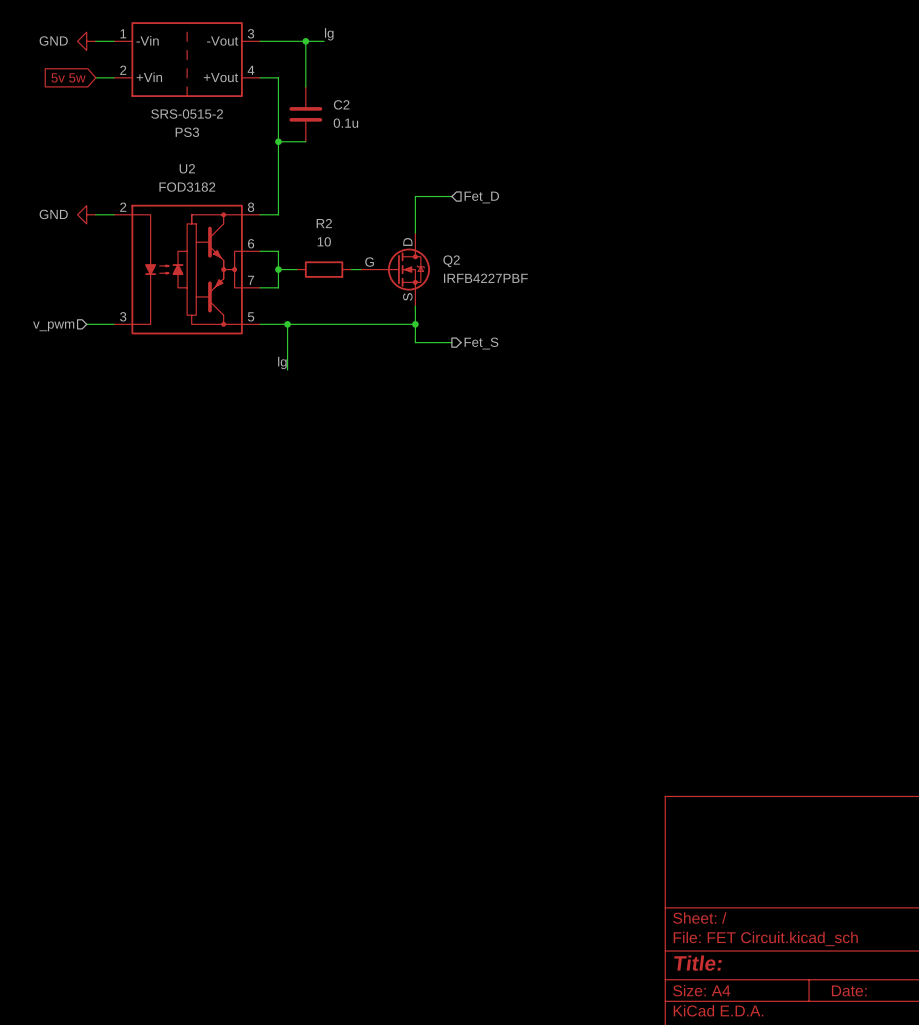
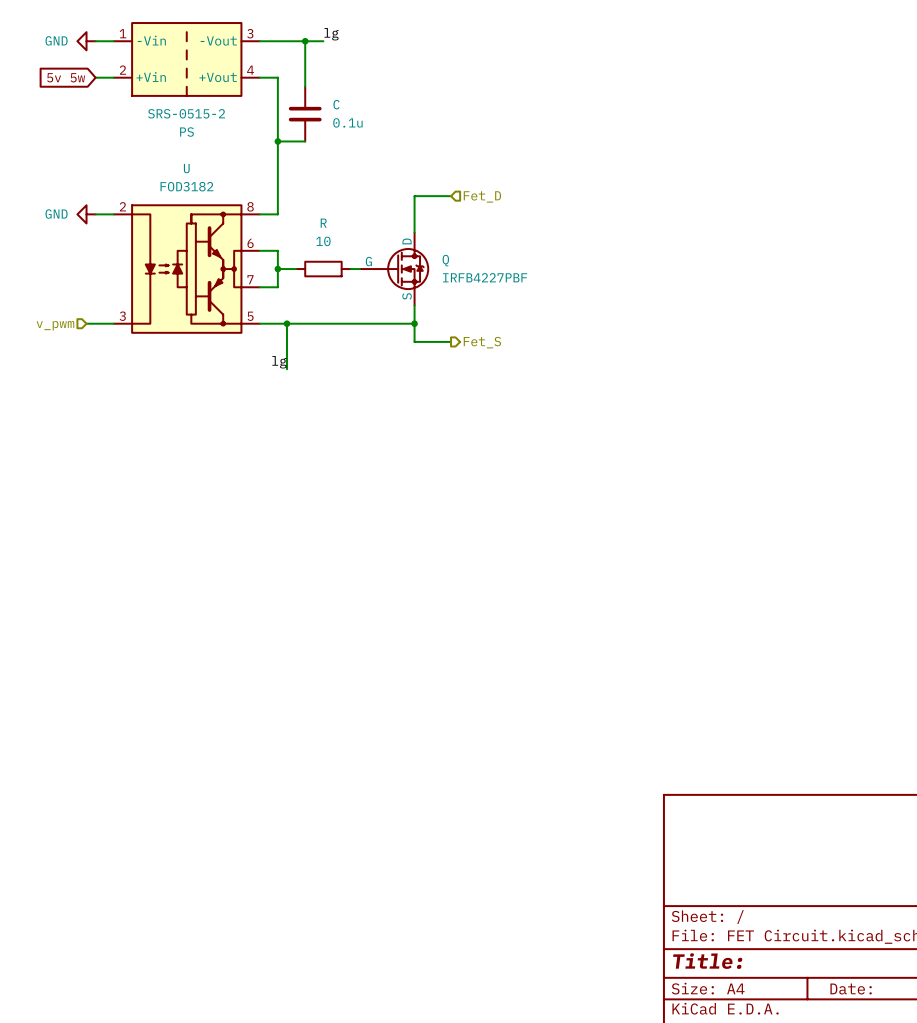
C2 name: C2 (341, 104) -> C (336, 104)
PS3 name: PS3 (187, 132) -> PS (186, 132)
U2 name: U2 (187, 168) -> U (186, 168)
R2 name: R2 (324, 223) -> R (323, 223)
Q2 name: Q2 (451, 261) -> Q (445, 260)

